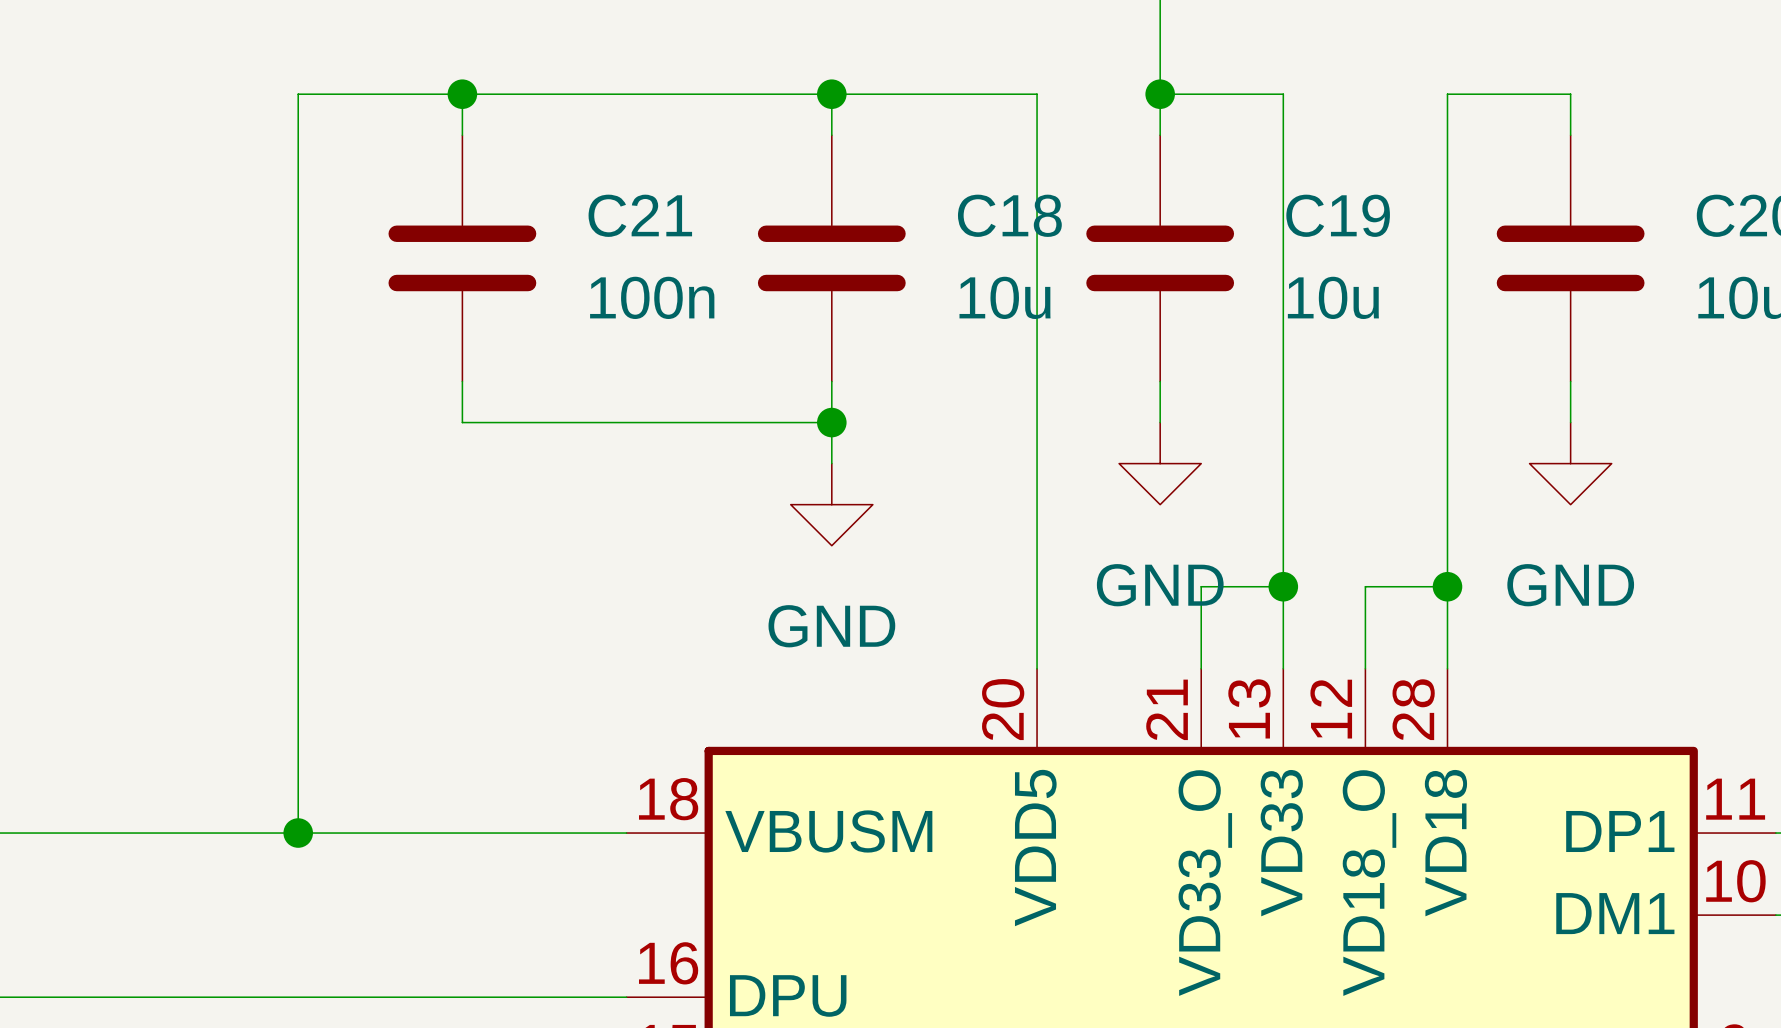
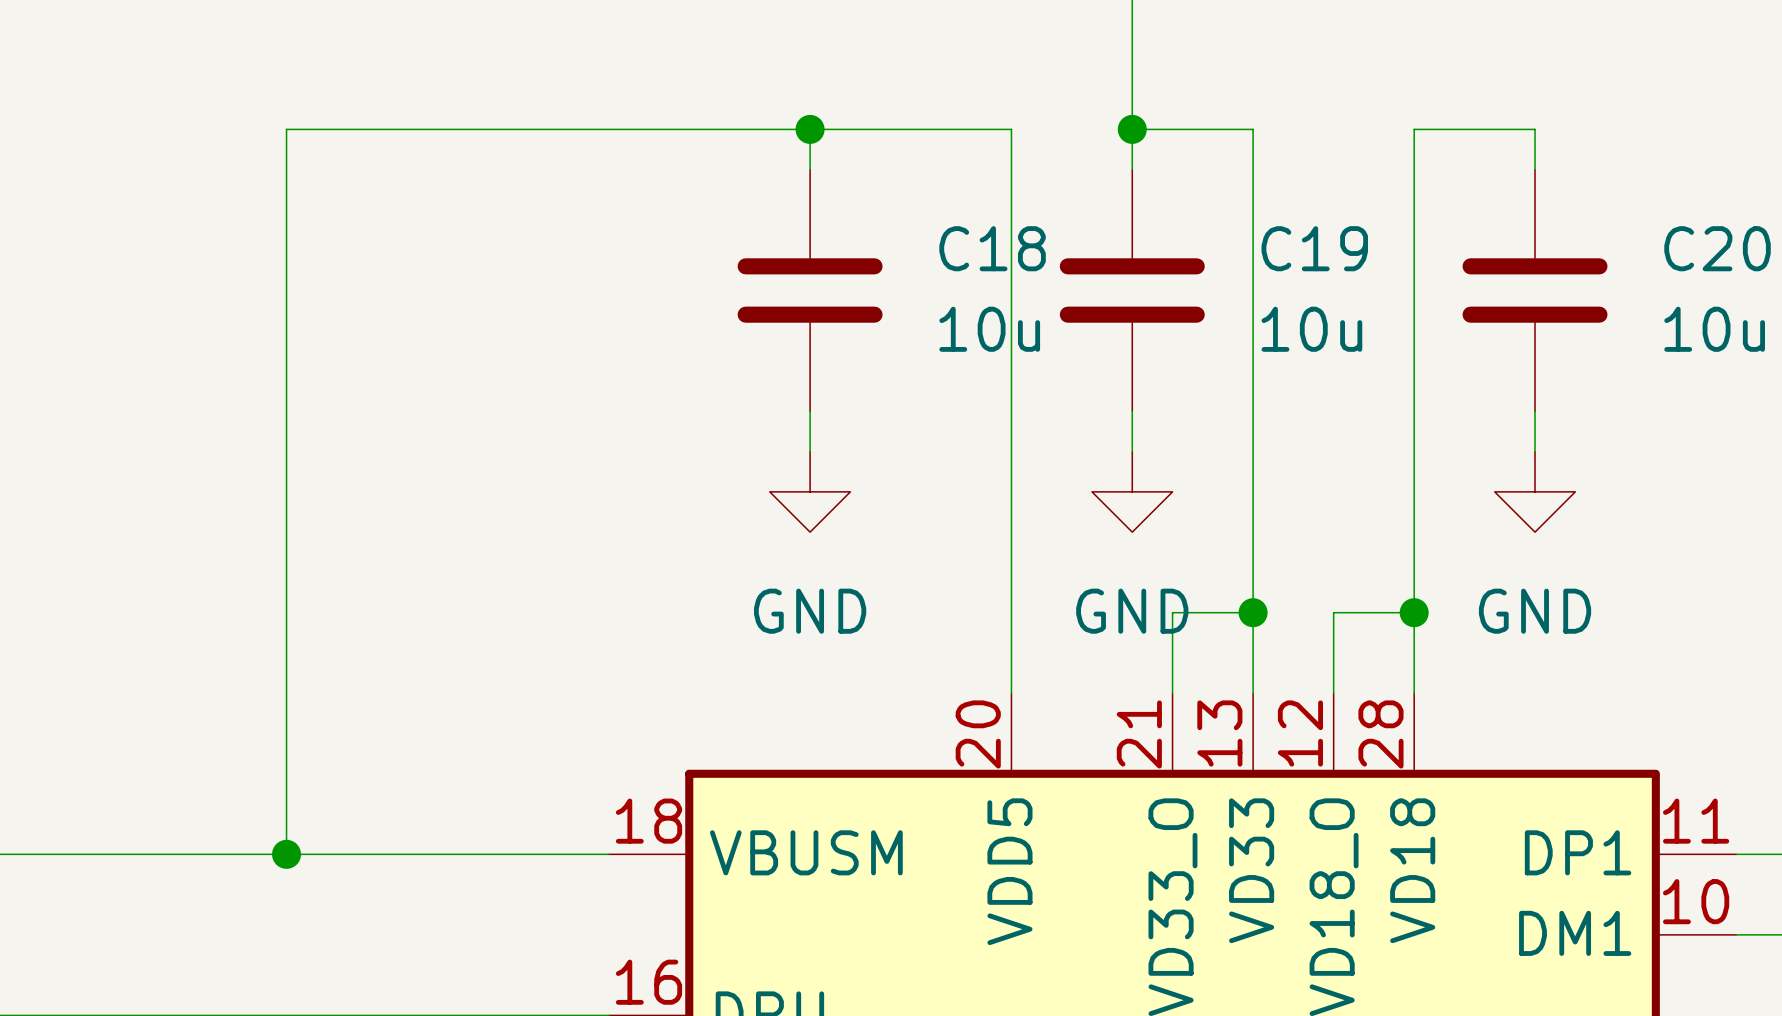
wire: (462, 94) (462, 135) -> none
junction: (462, 94) -> none
C21: 100n (462, 258) -> none
wire: (462, 381) (462, 422) (831, 422) (831, 463) -> none
junction: (831, 422) -> none
power symbol position: GND (831, 504) -> GND (810, 491)

